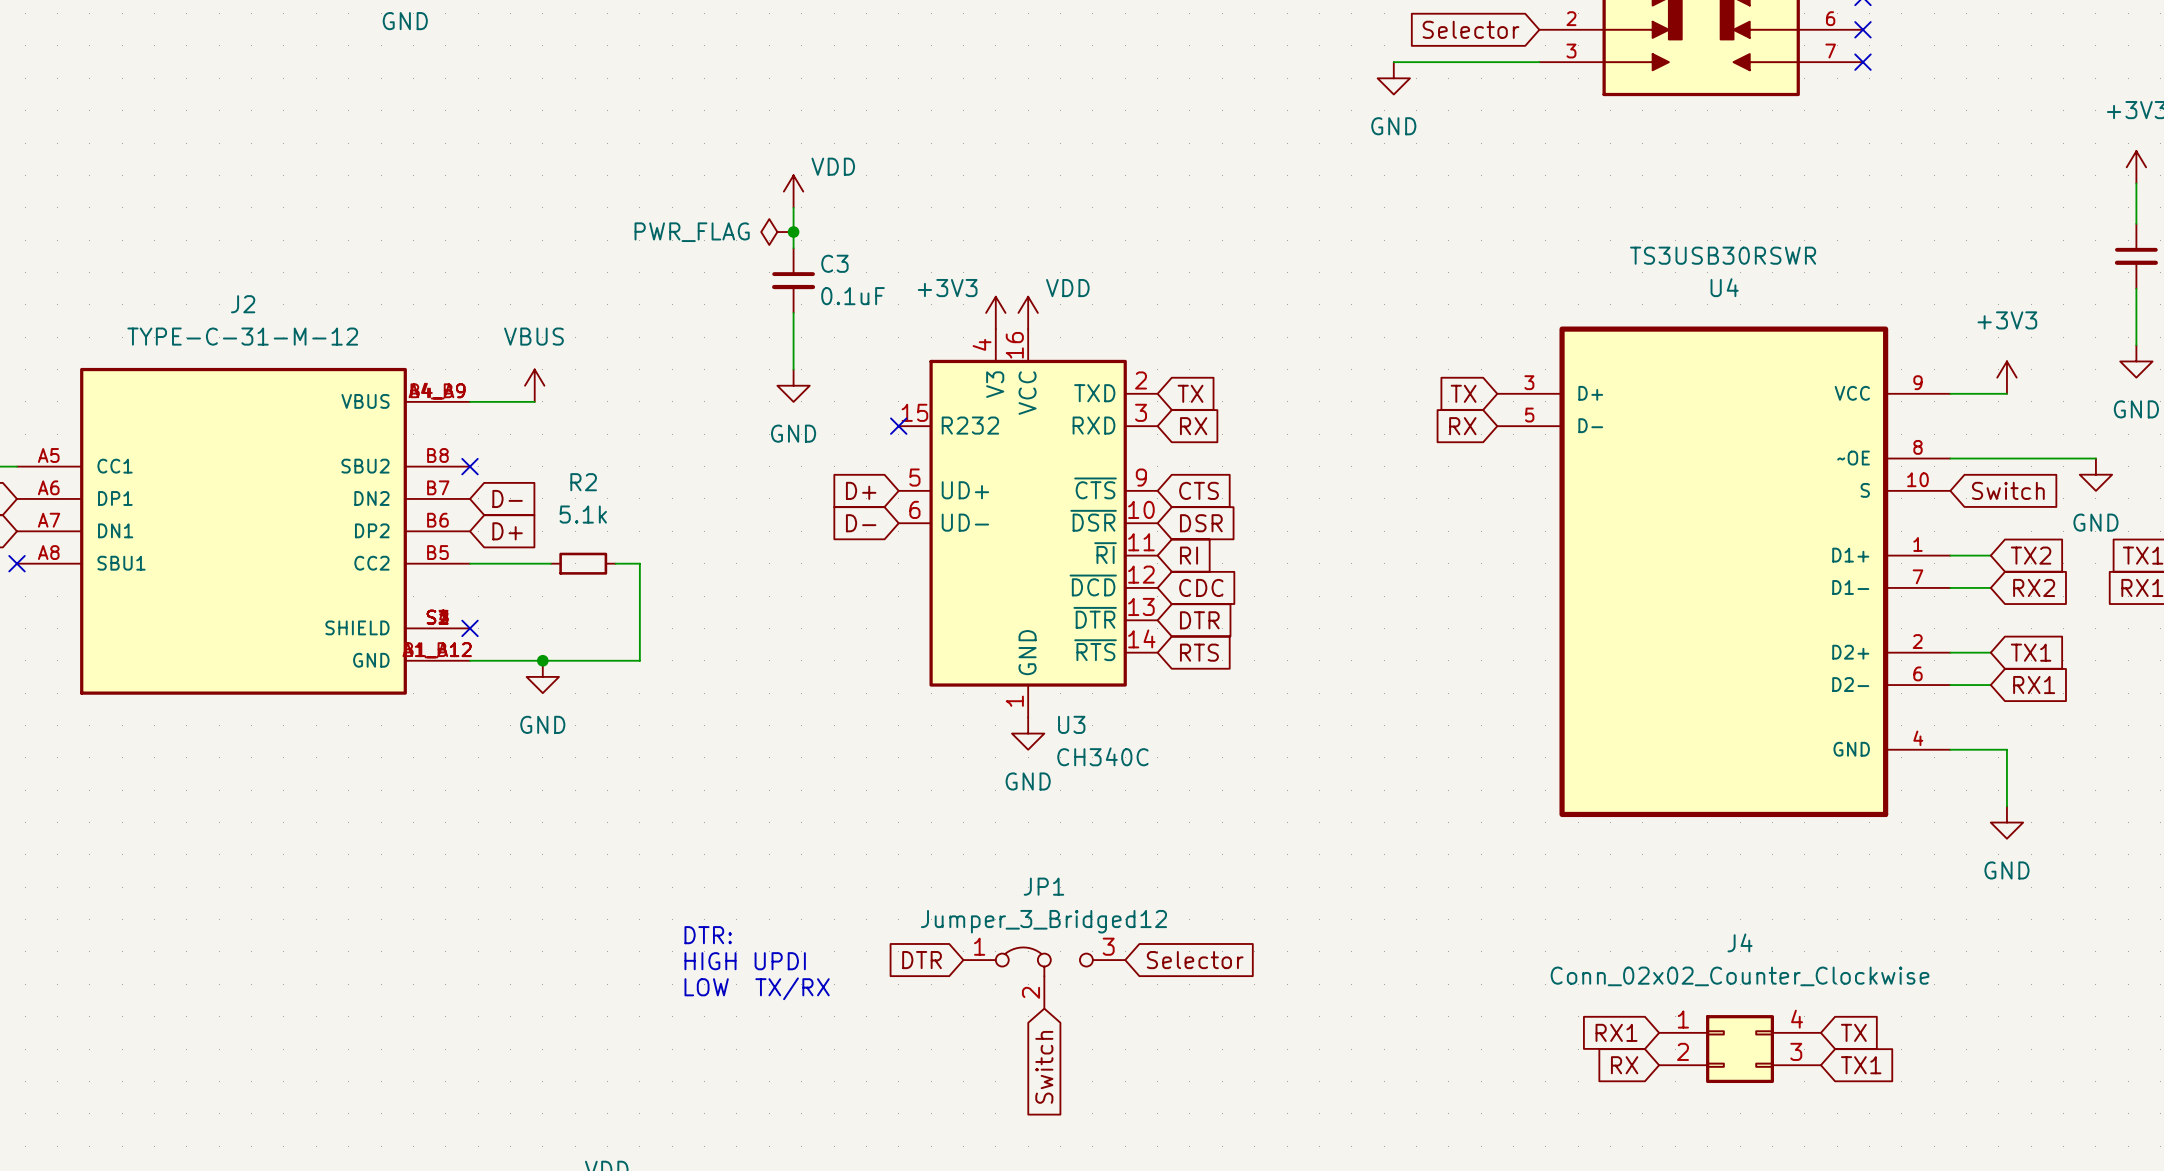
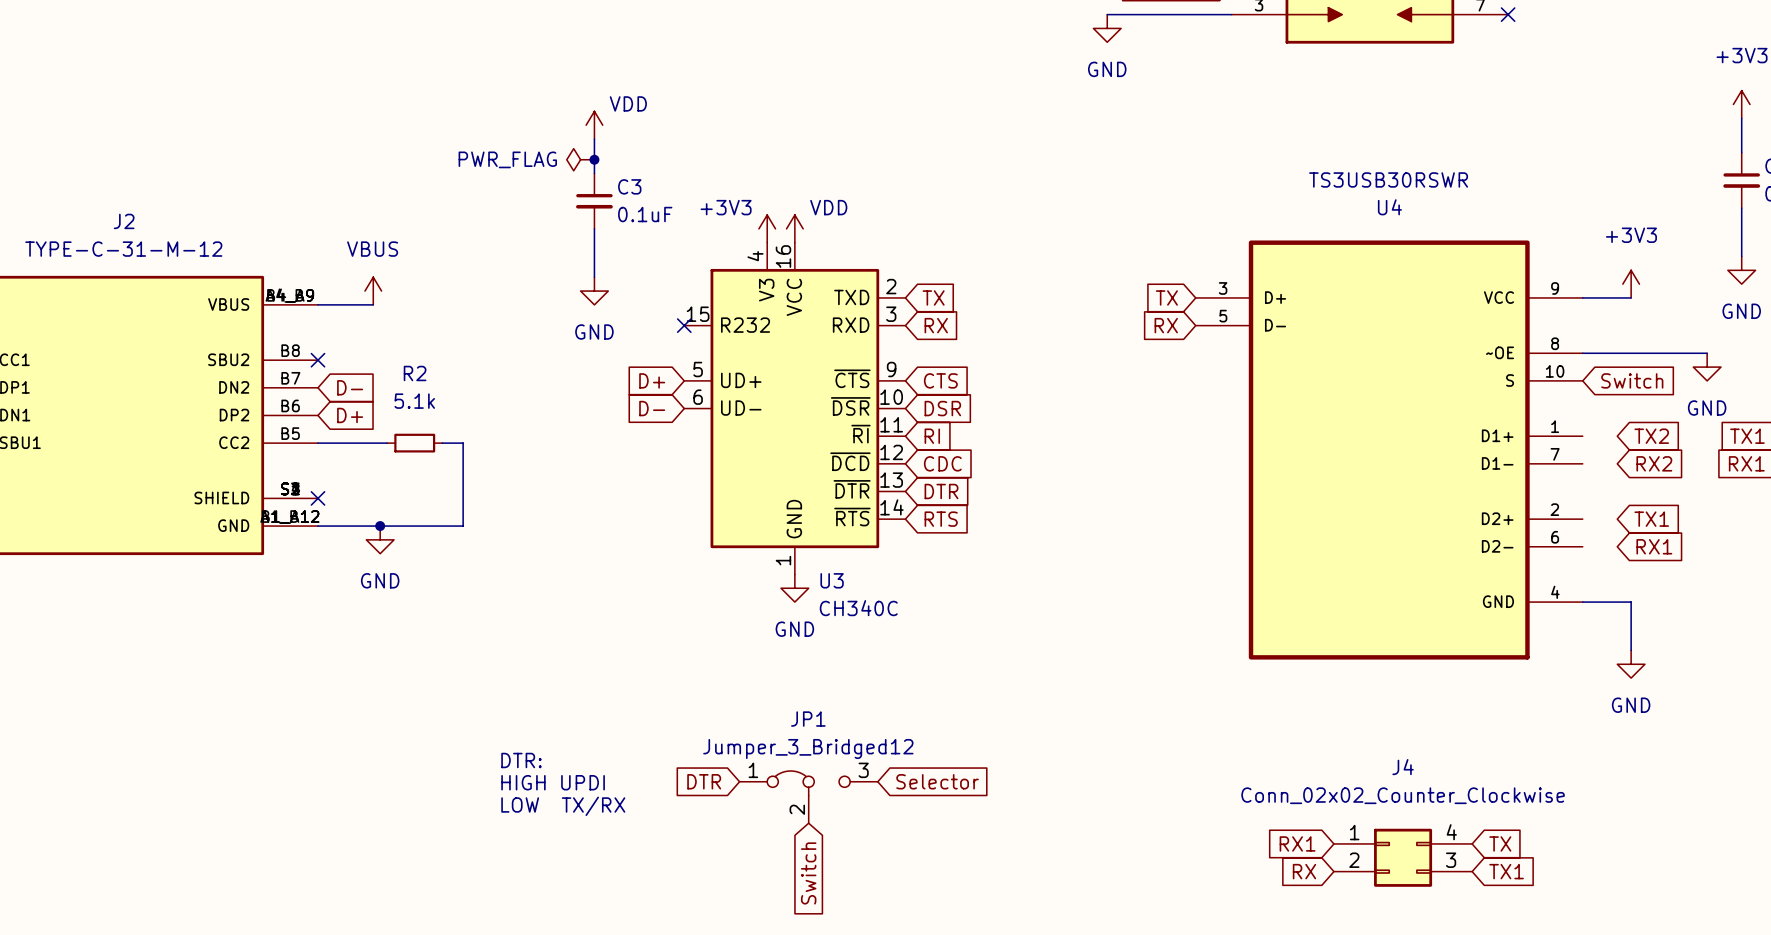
wire: (1950, 555) (1990, 555) -> none
wire: (1950, 587) (1990, 587) -> none
wire: (1950, 652) (1990, 652) -> none
wire: (1950, 685) (1990, 685) -> none

